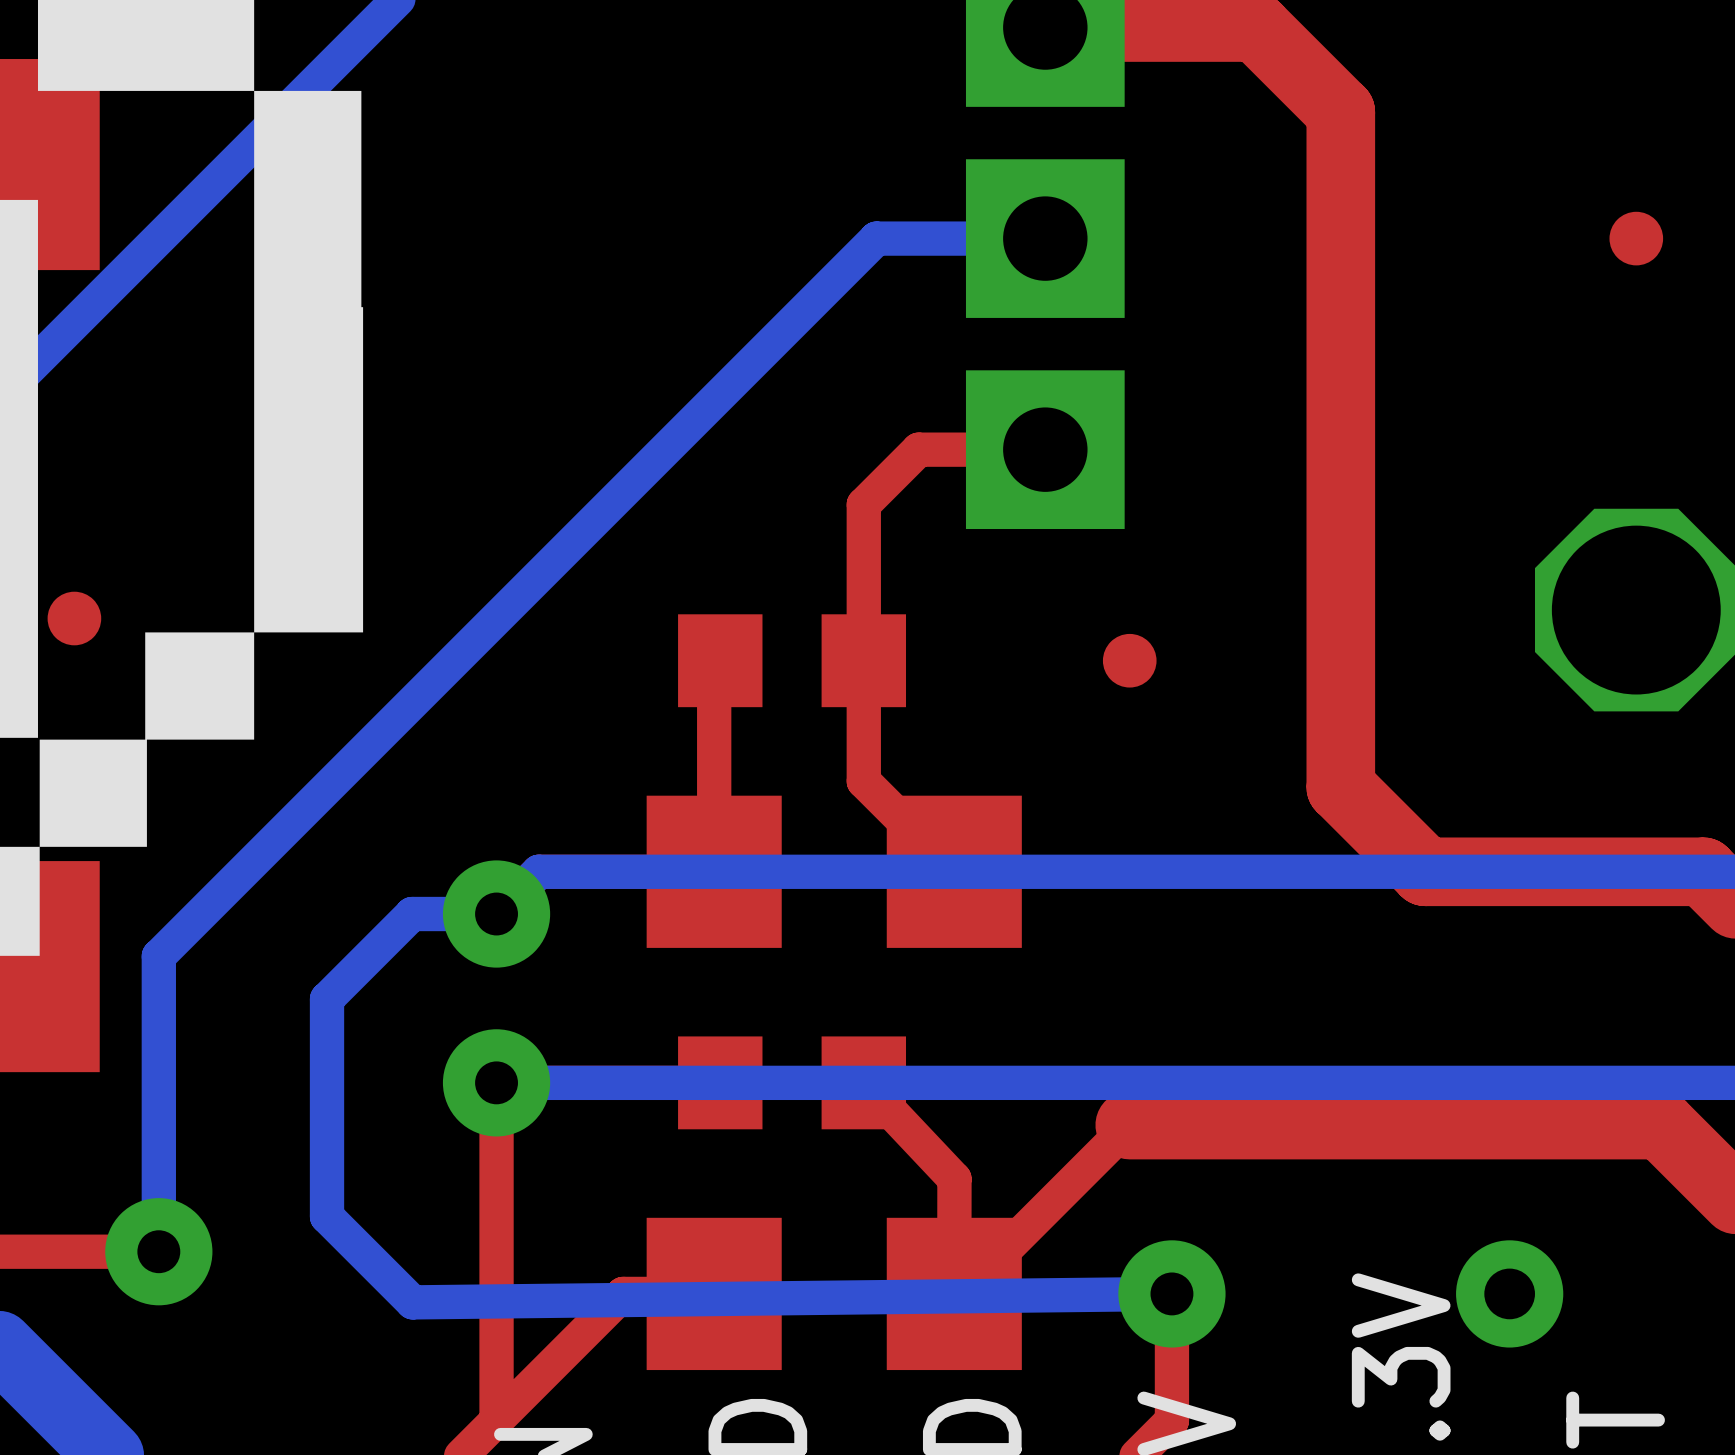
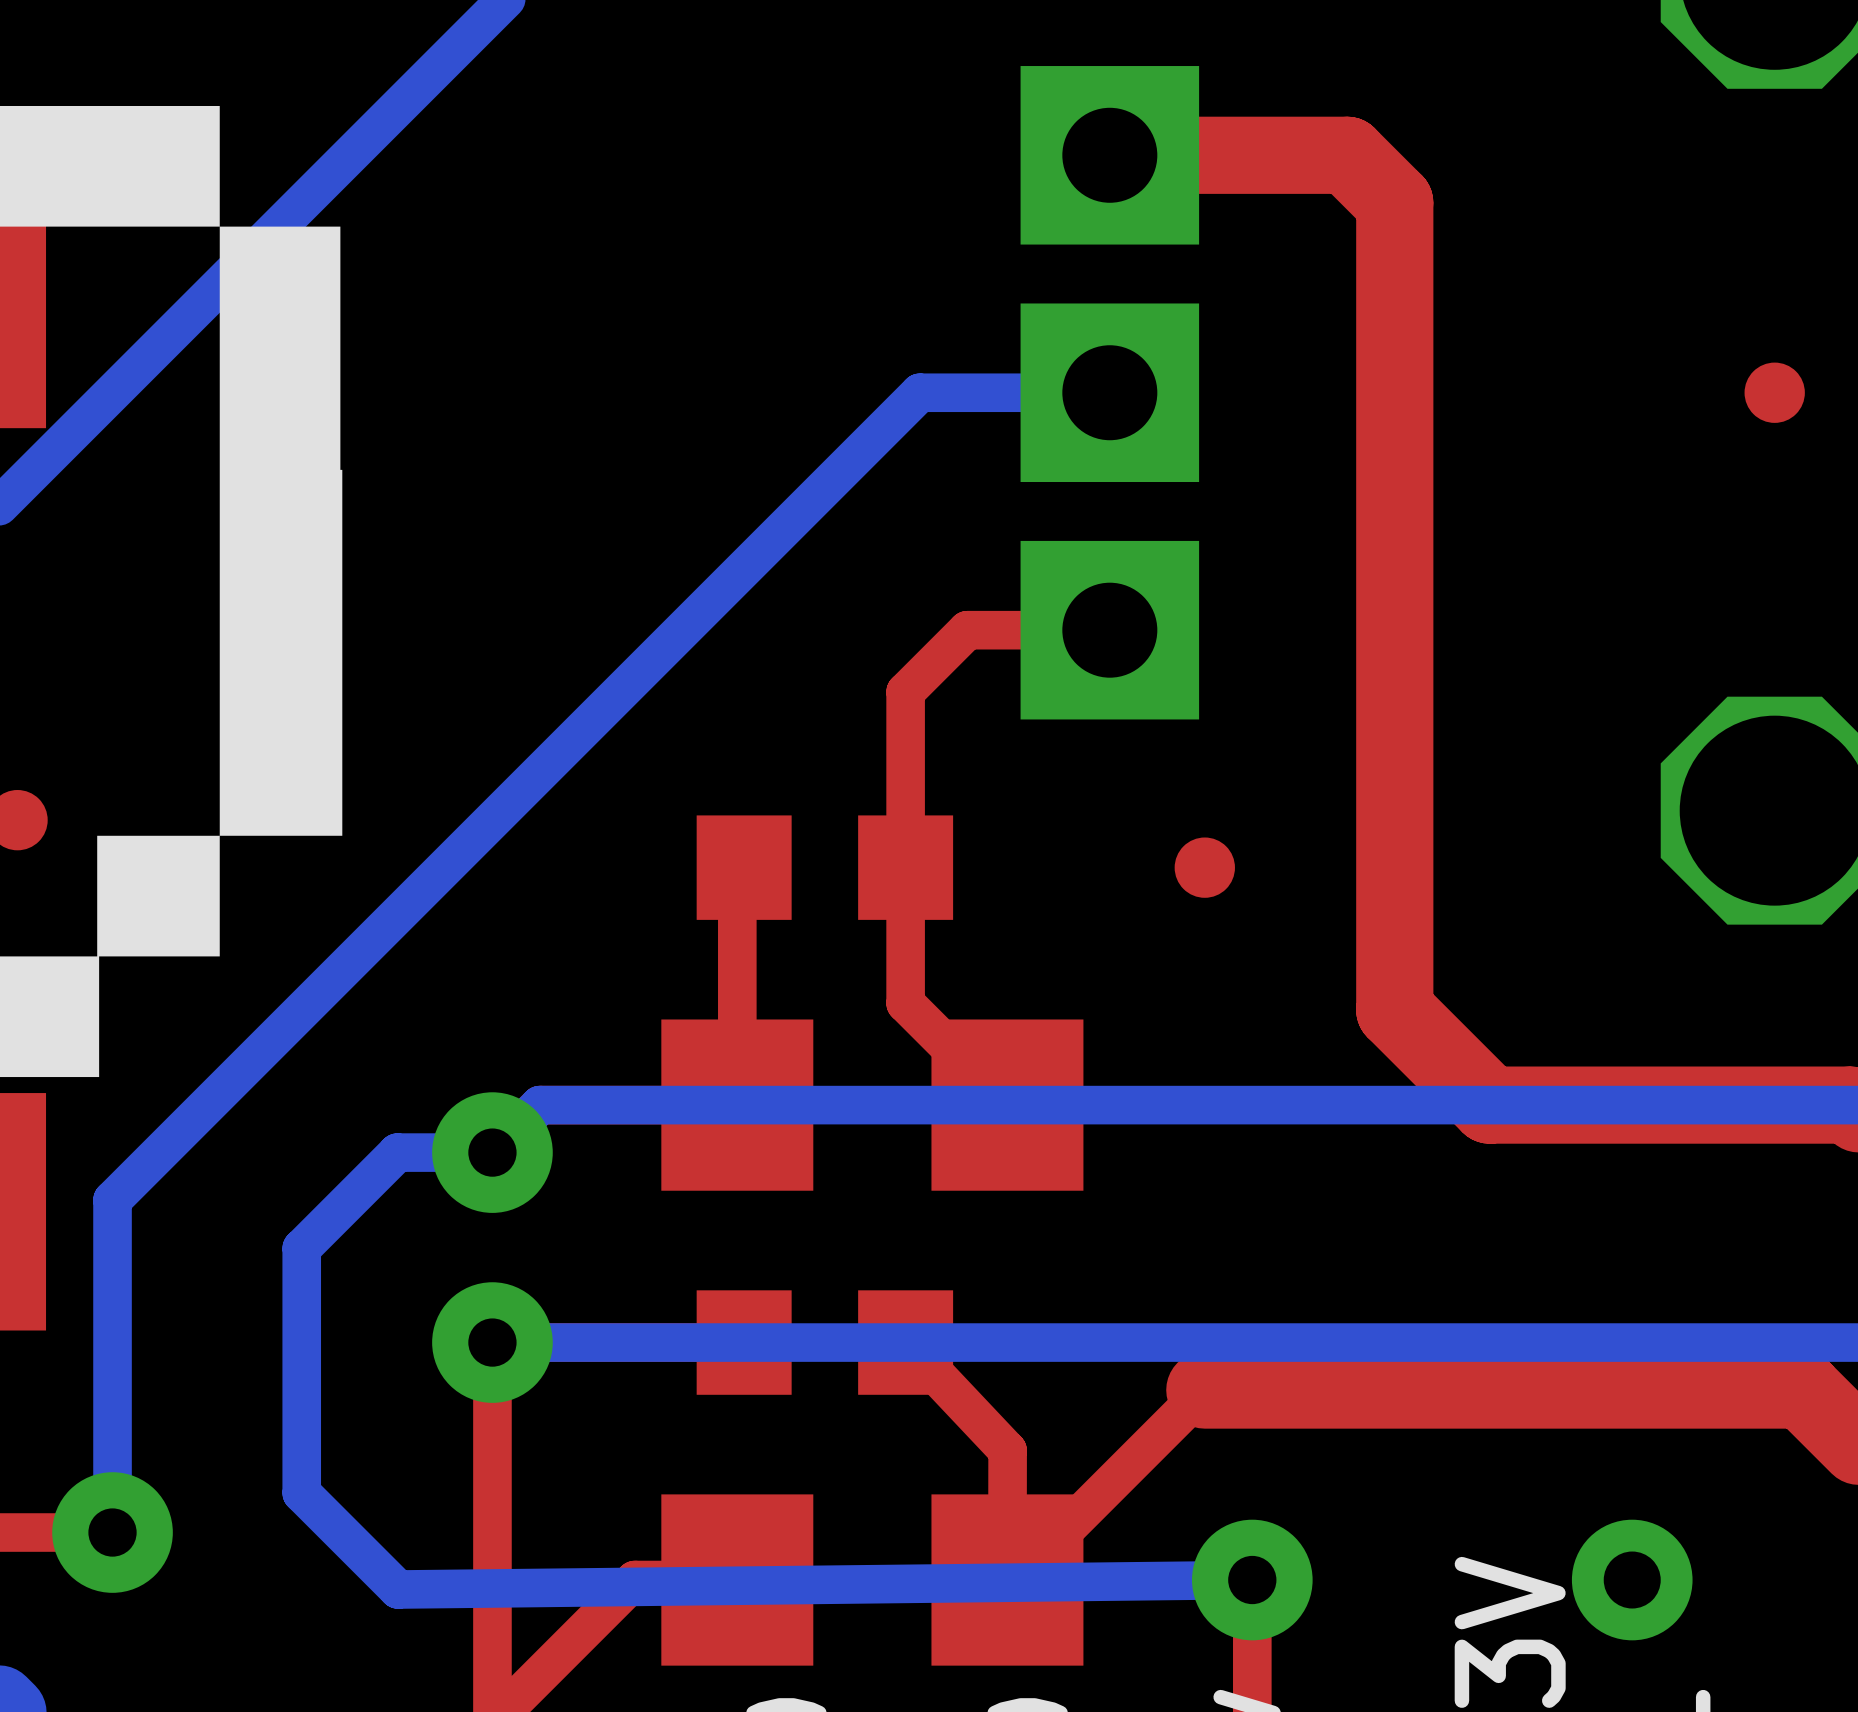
top track: (1298, 69) (1340, 111) (1340, 787) (1425, 871) -> (1394, 202) (1394, 1010) (1489, 1105) (1537, 1105)

